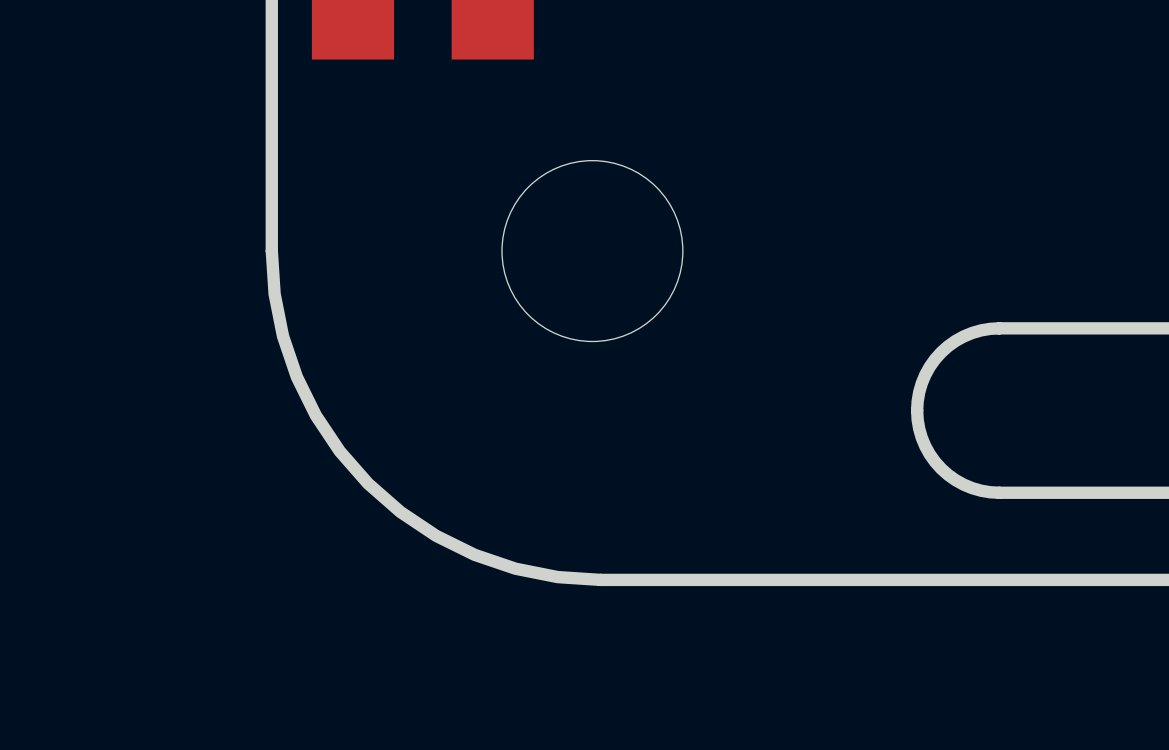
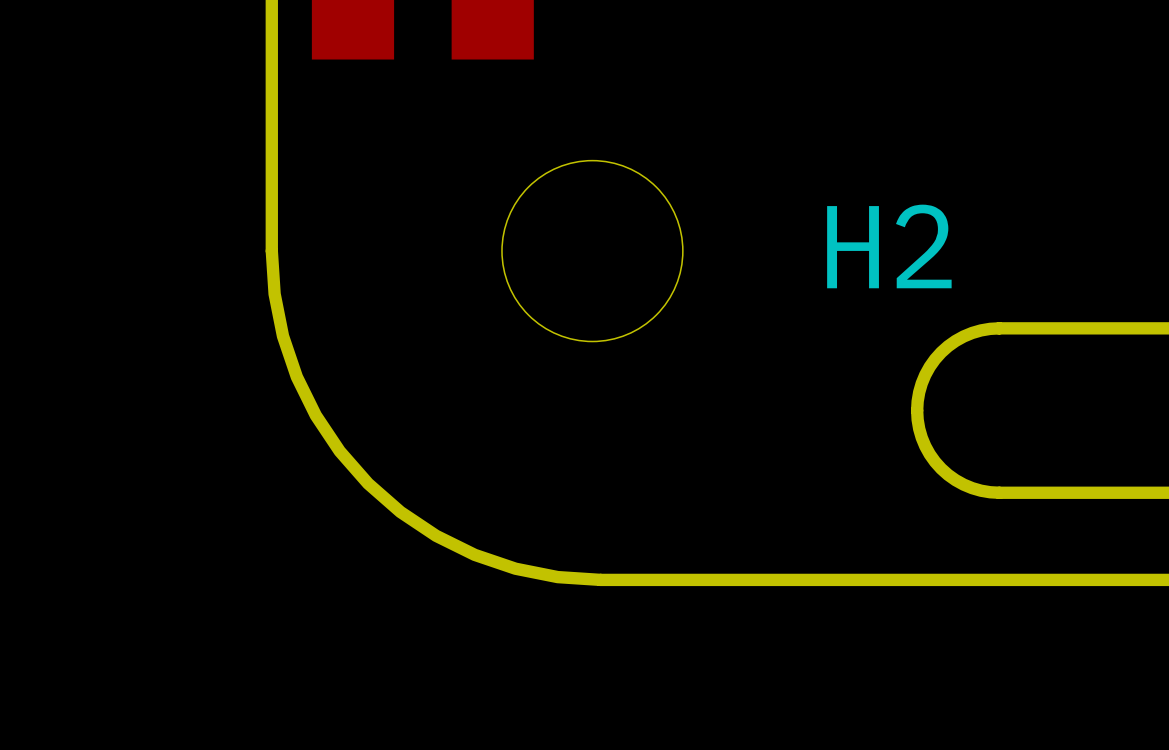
H2 name: none -> H2 (889, 246)

